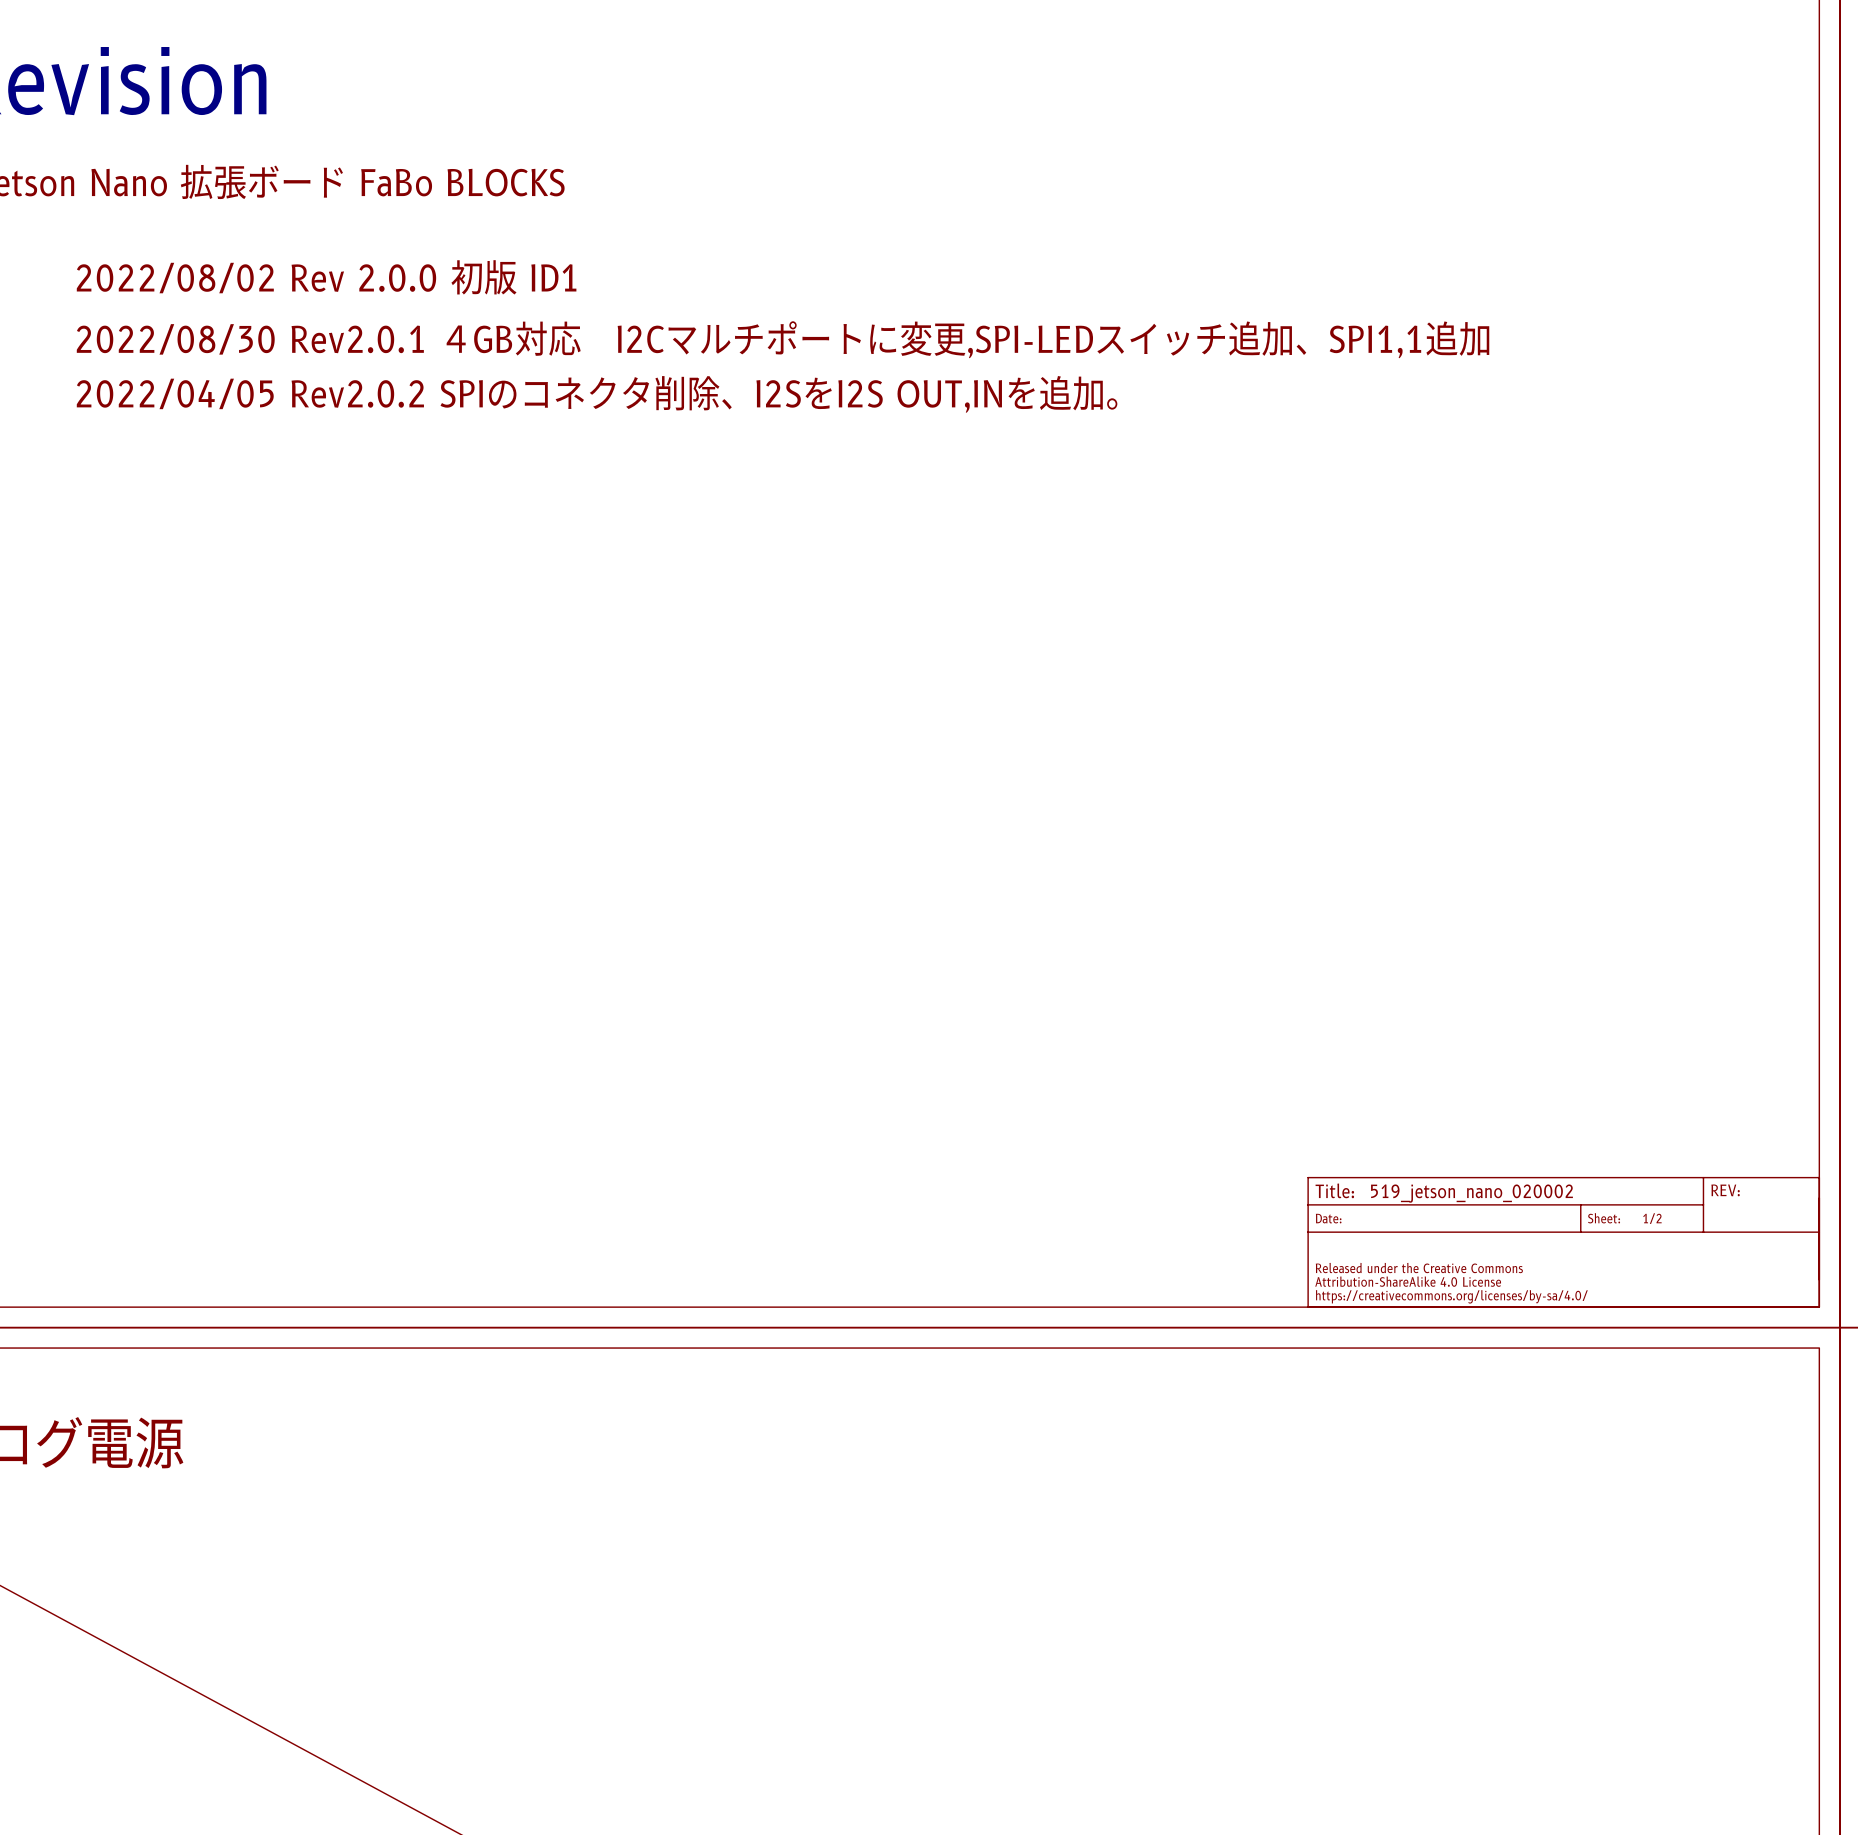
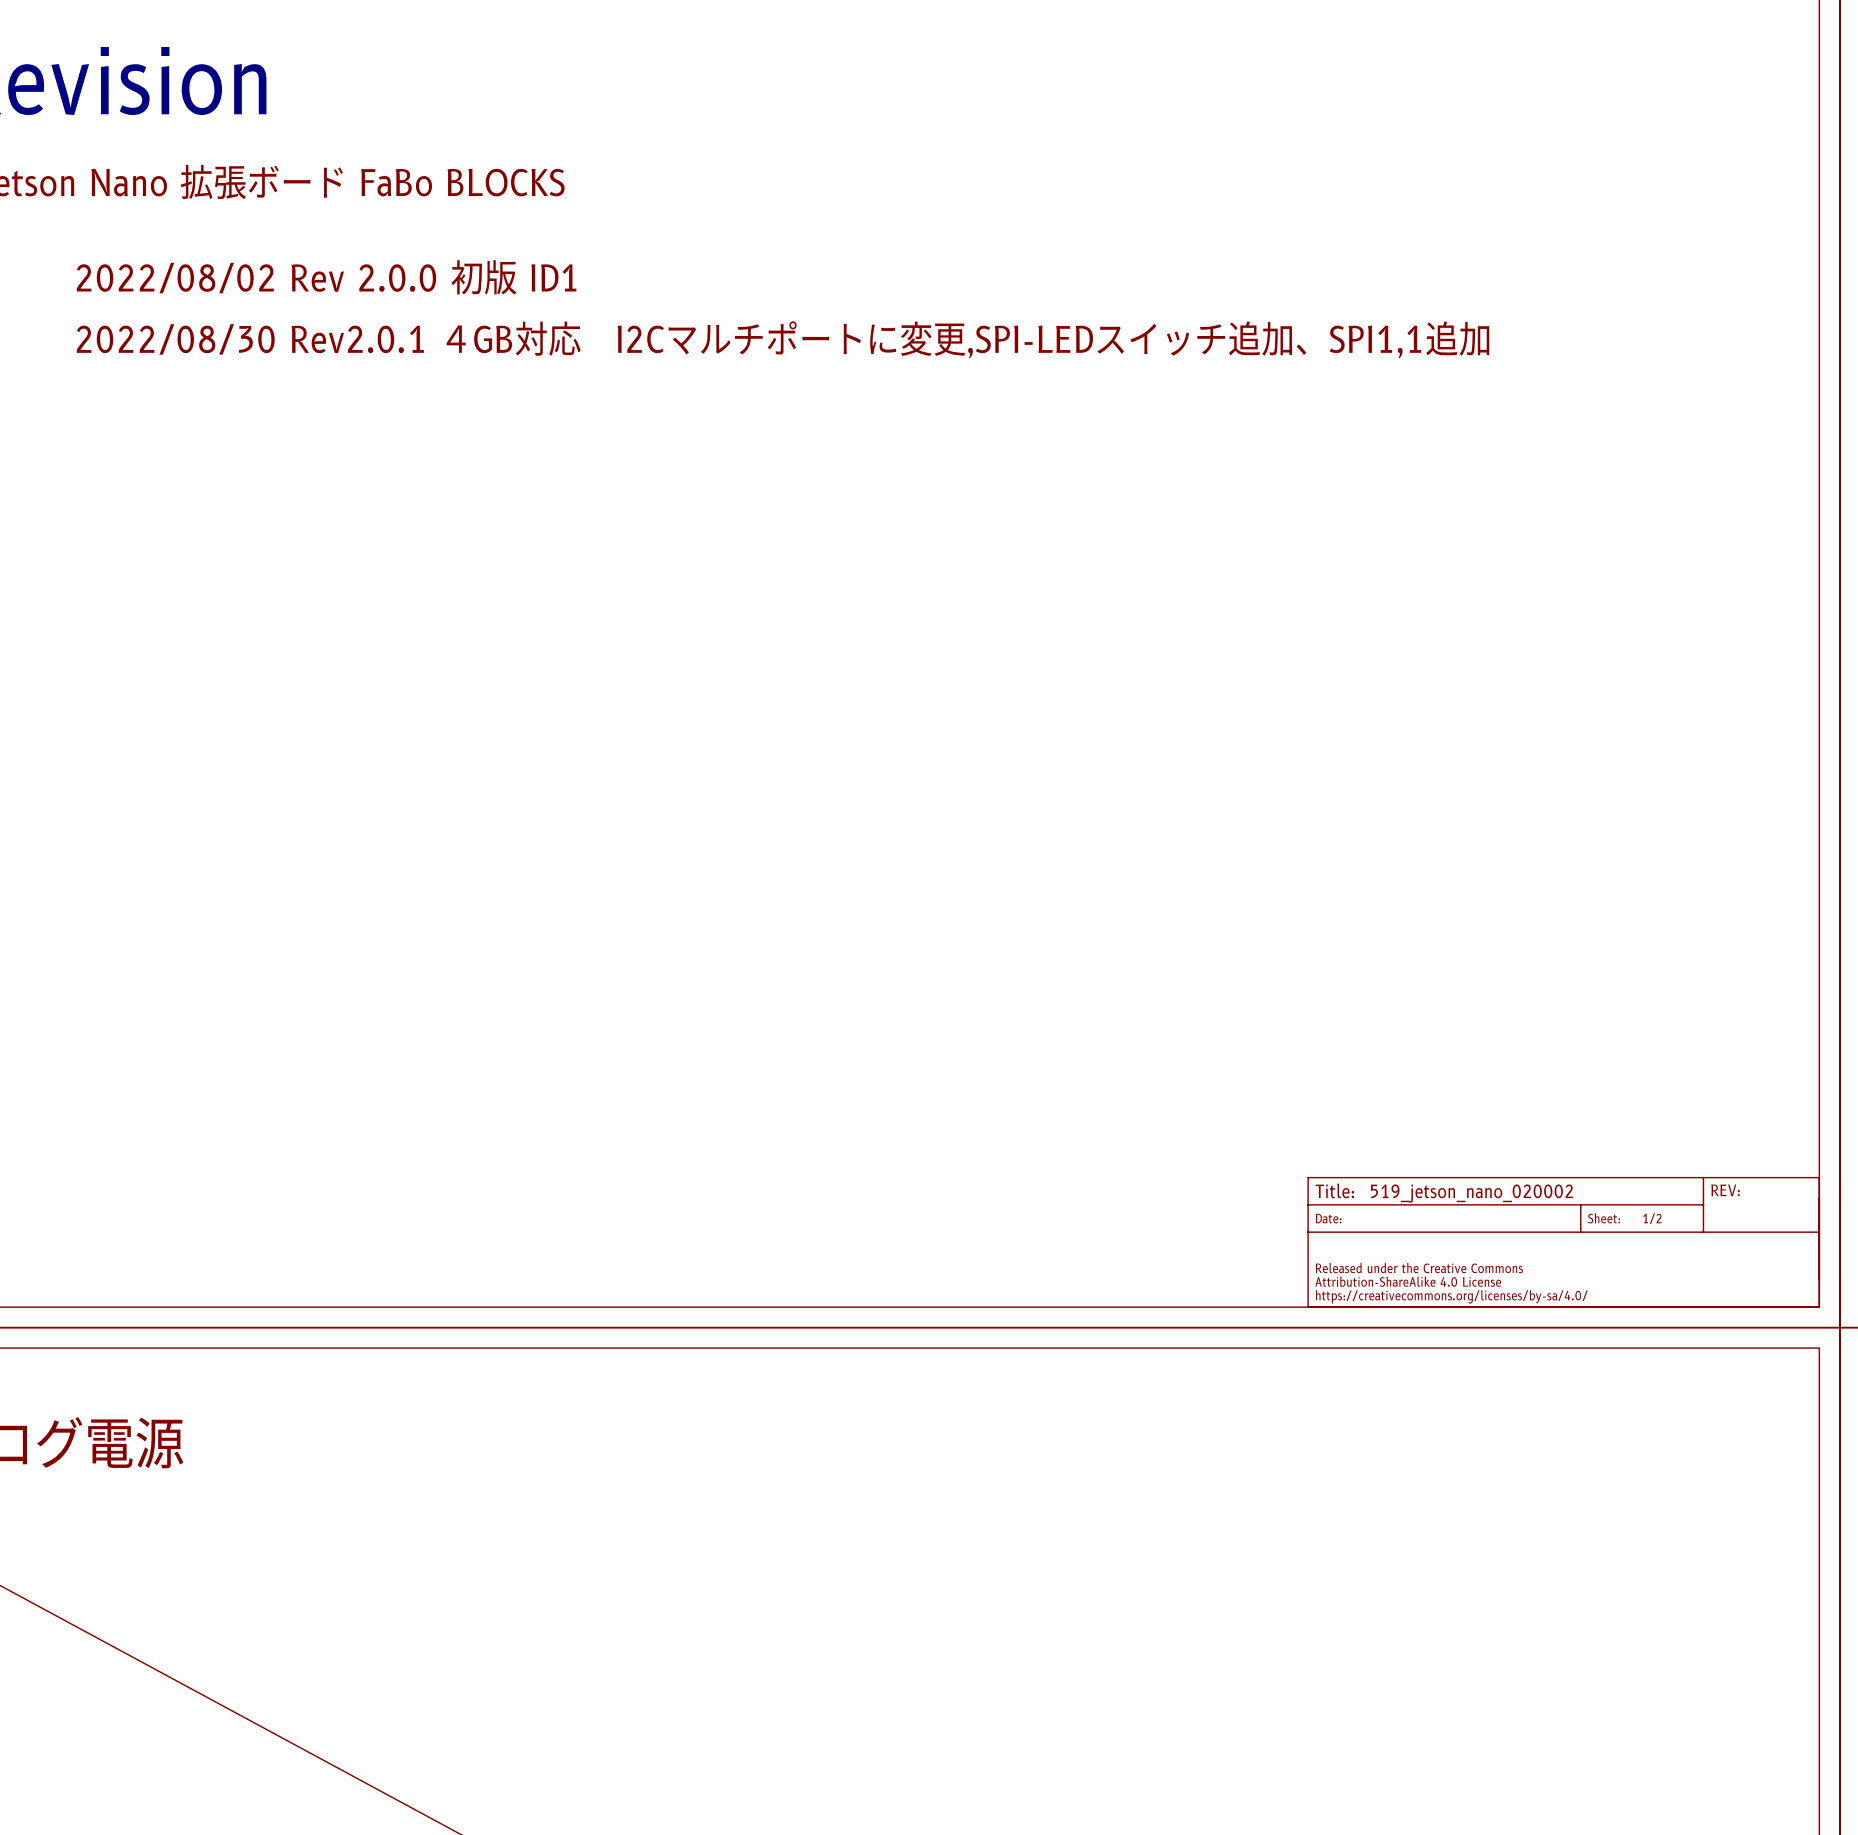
text: 2022/04/05 Rev2.0.2 SPIのコネクタ削除、I2SをI2S OUT,INを追加。 (597, 394) -> none

